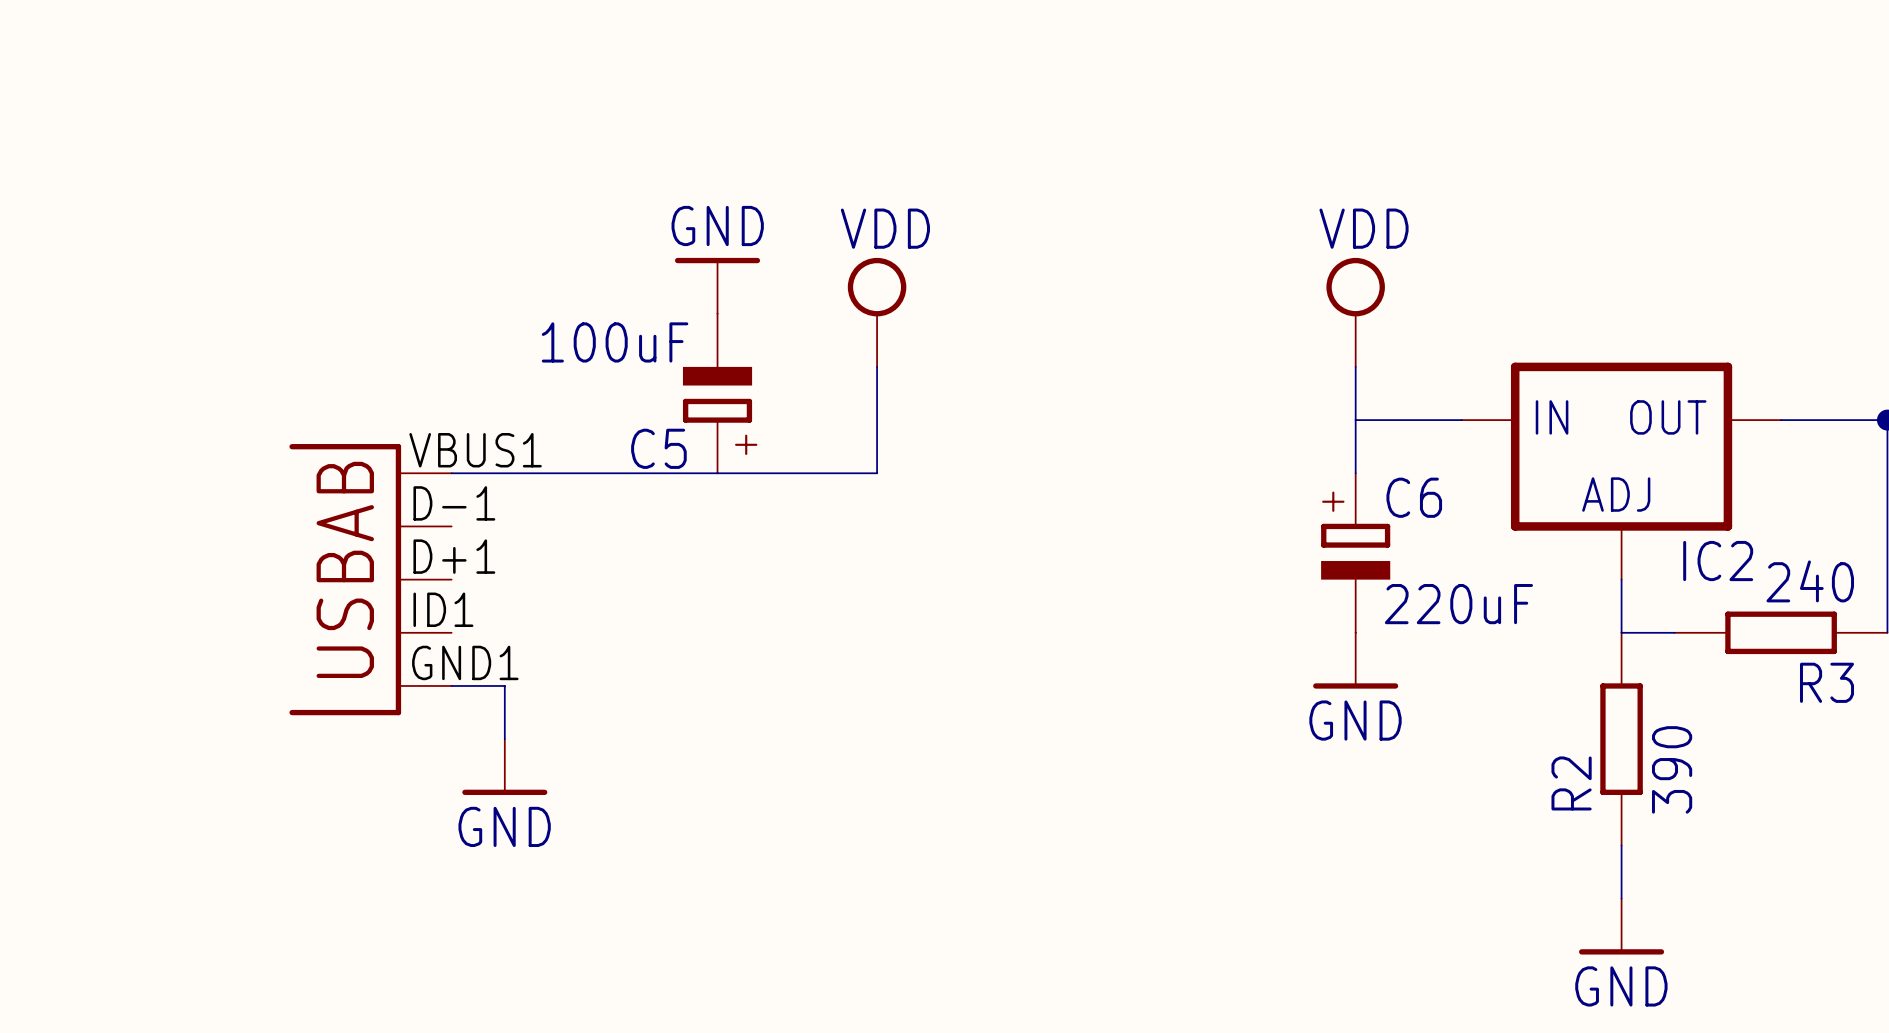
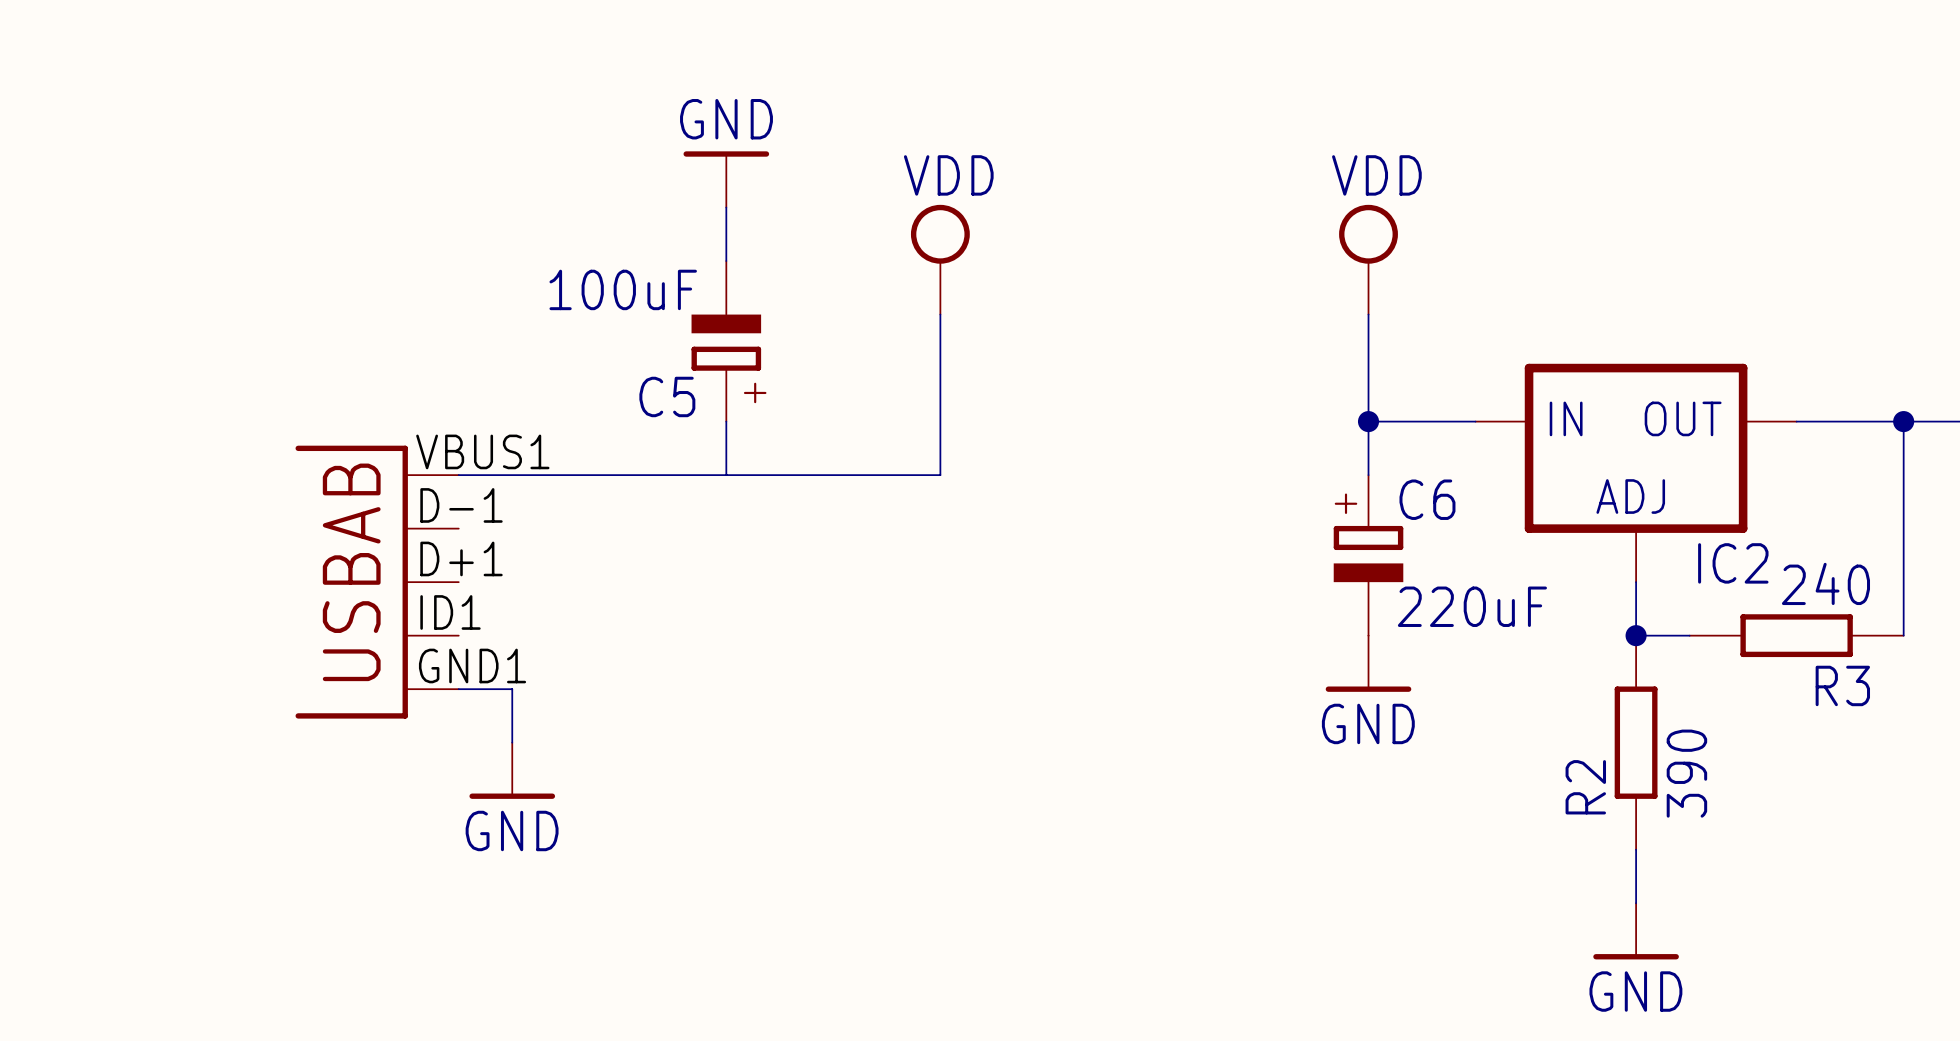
wire: none -> (726, 207) (726, 261)
power symbol position: GND (717, 285) -> GND (726, 179)
power symbol position: VDD (877, 312) -> VDD (940, 259)
power symbol position: VDD (1355, 312) -> VDD (1368, 259)
wire: (877, 366) (877, 473) -> (940, 314) (940, 475) (886, 475)
C5 position: (717, 393) -> (726, 341)
junction: none -> (1368, 421)
junction: none -> (1636, 635)

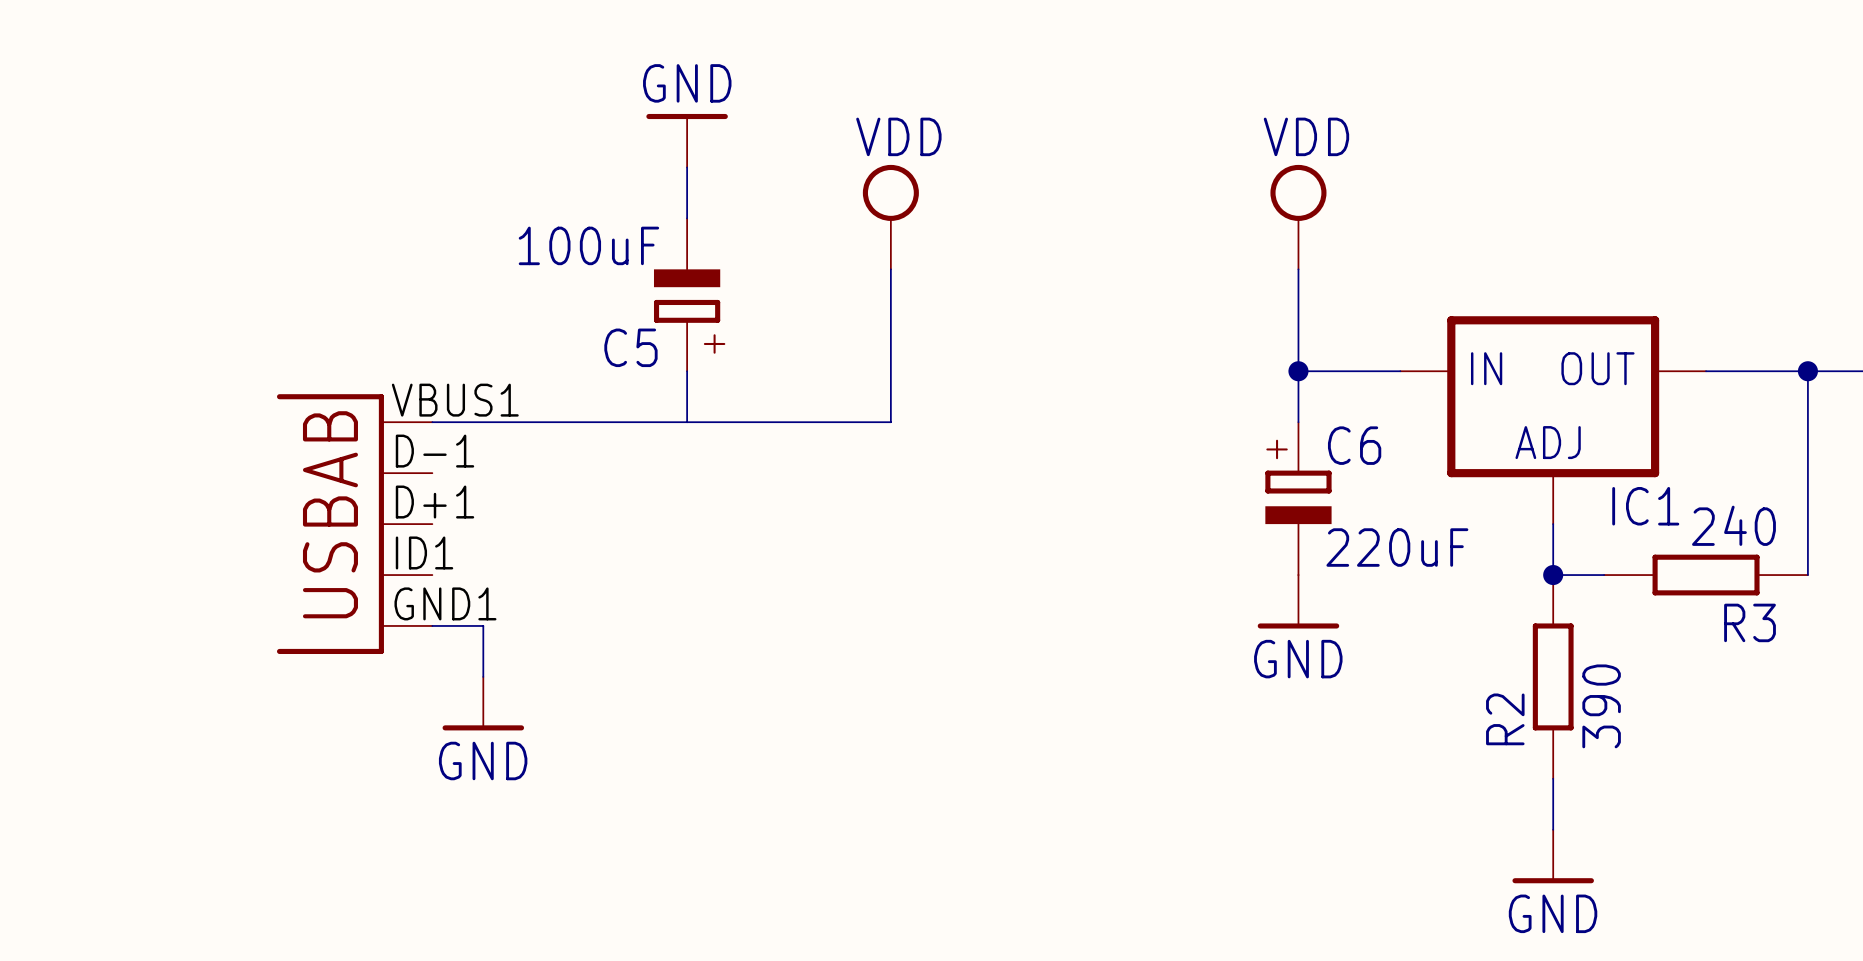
IC2 name: IC2 (1733, 563) -> IC1 (1645, 506)

